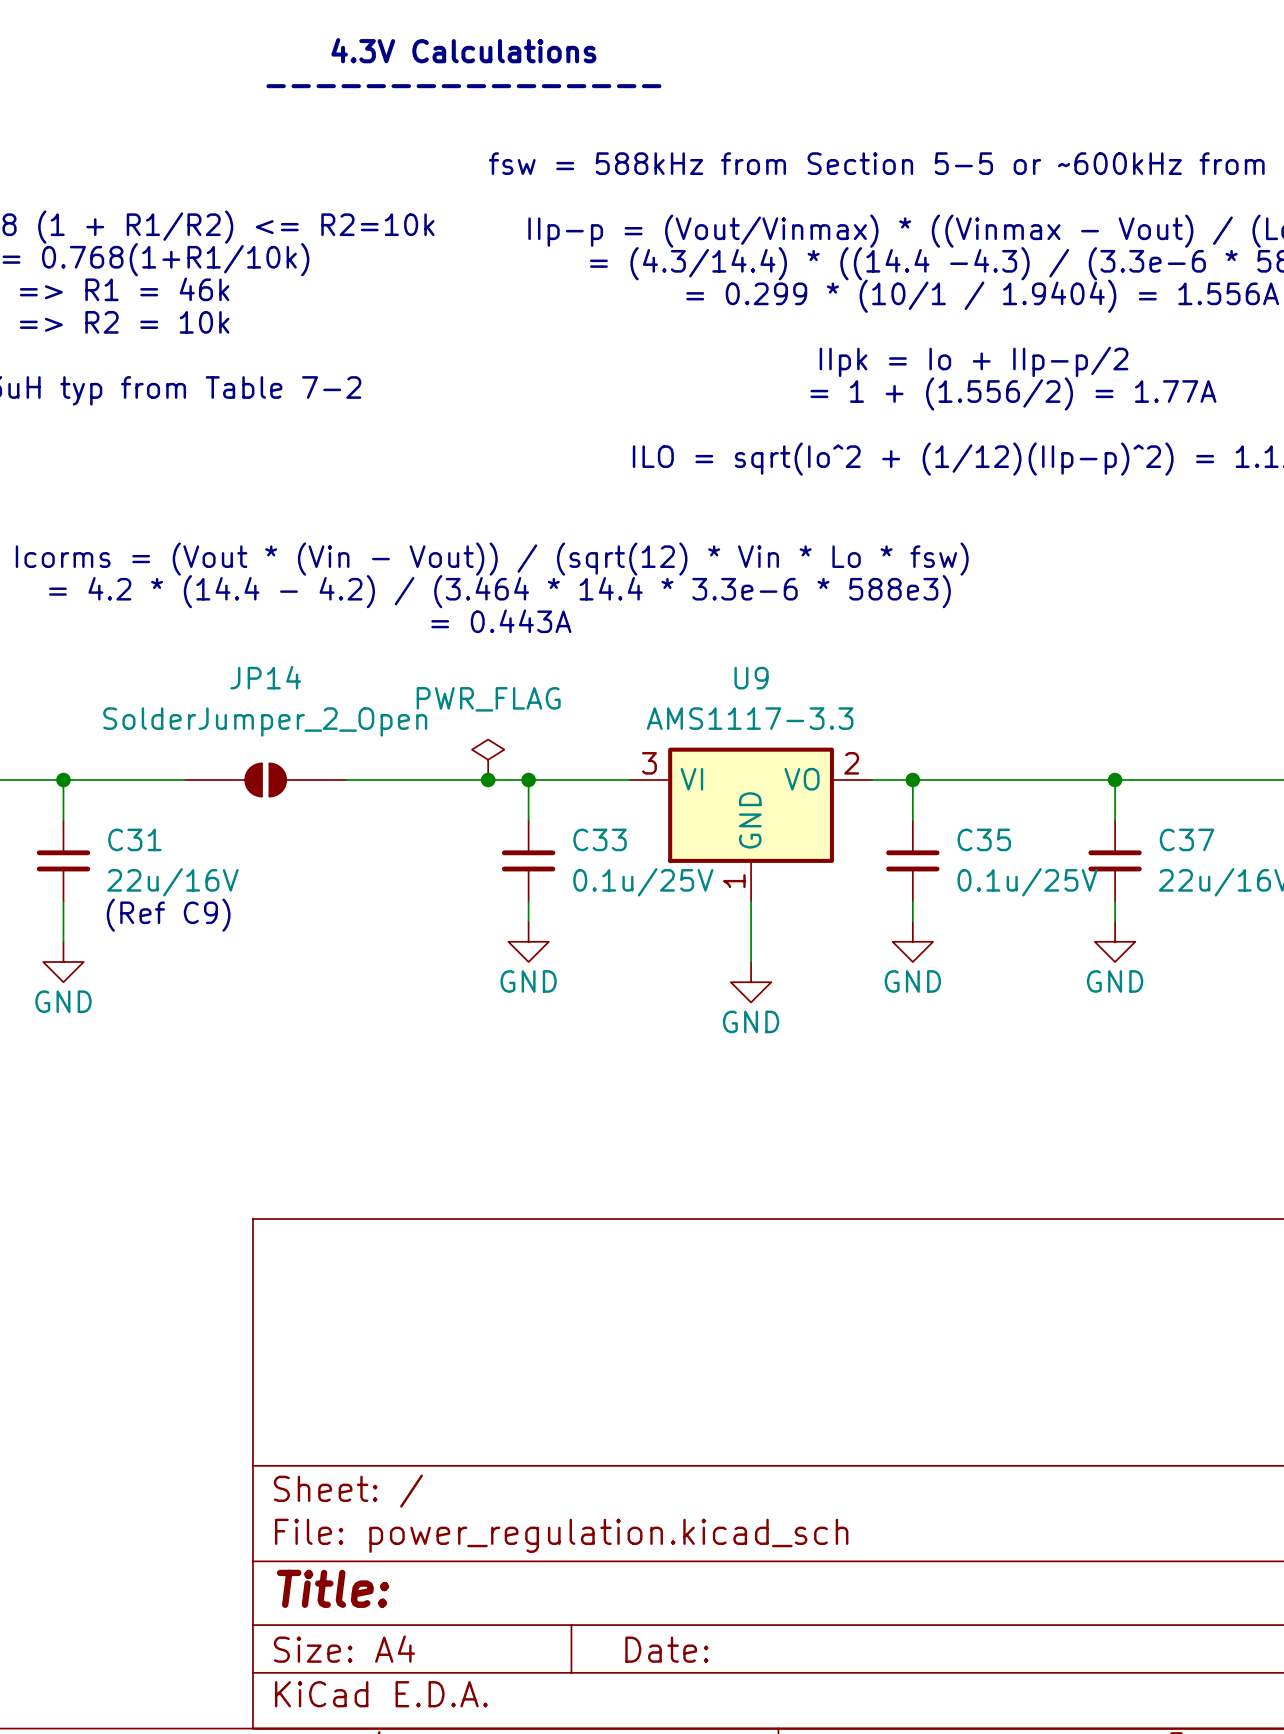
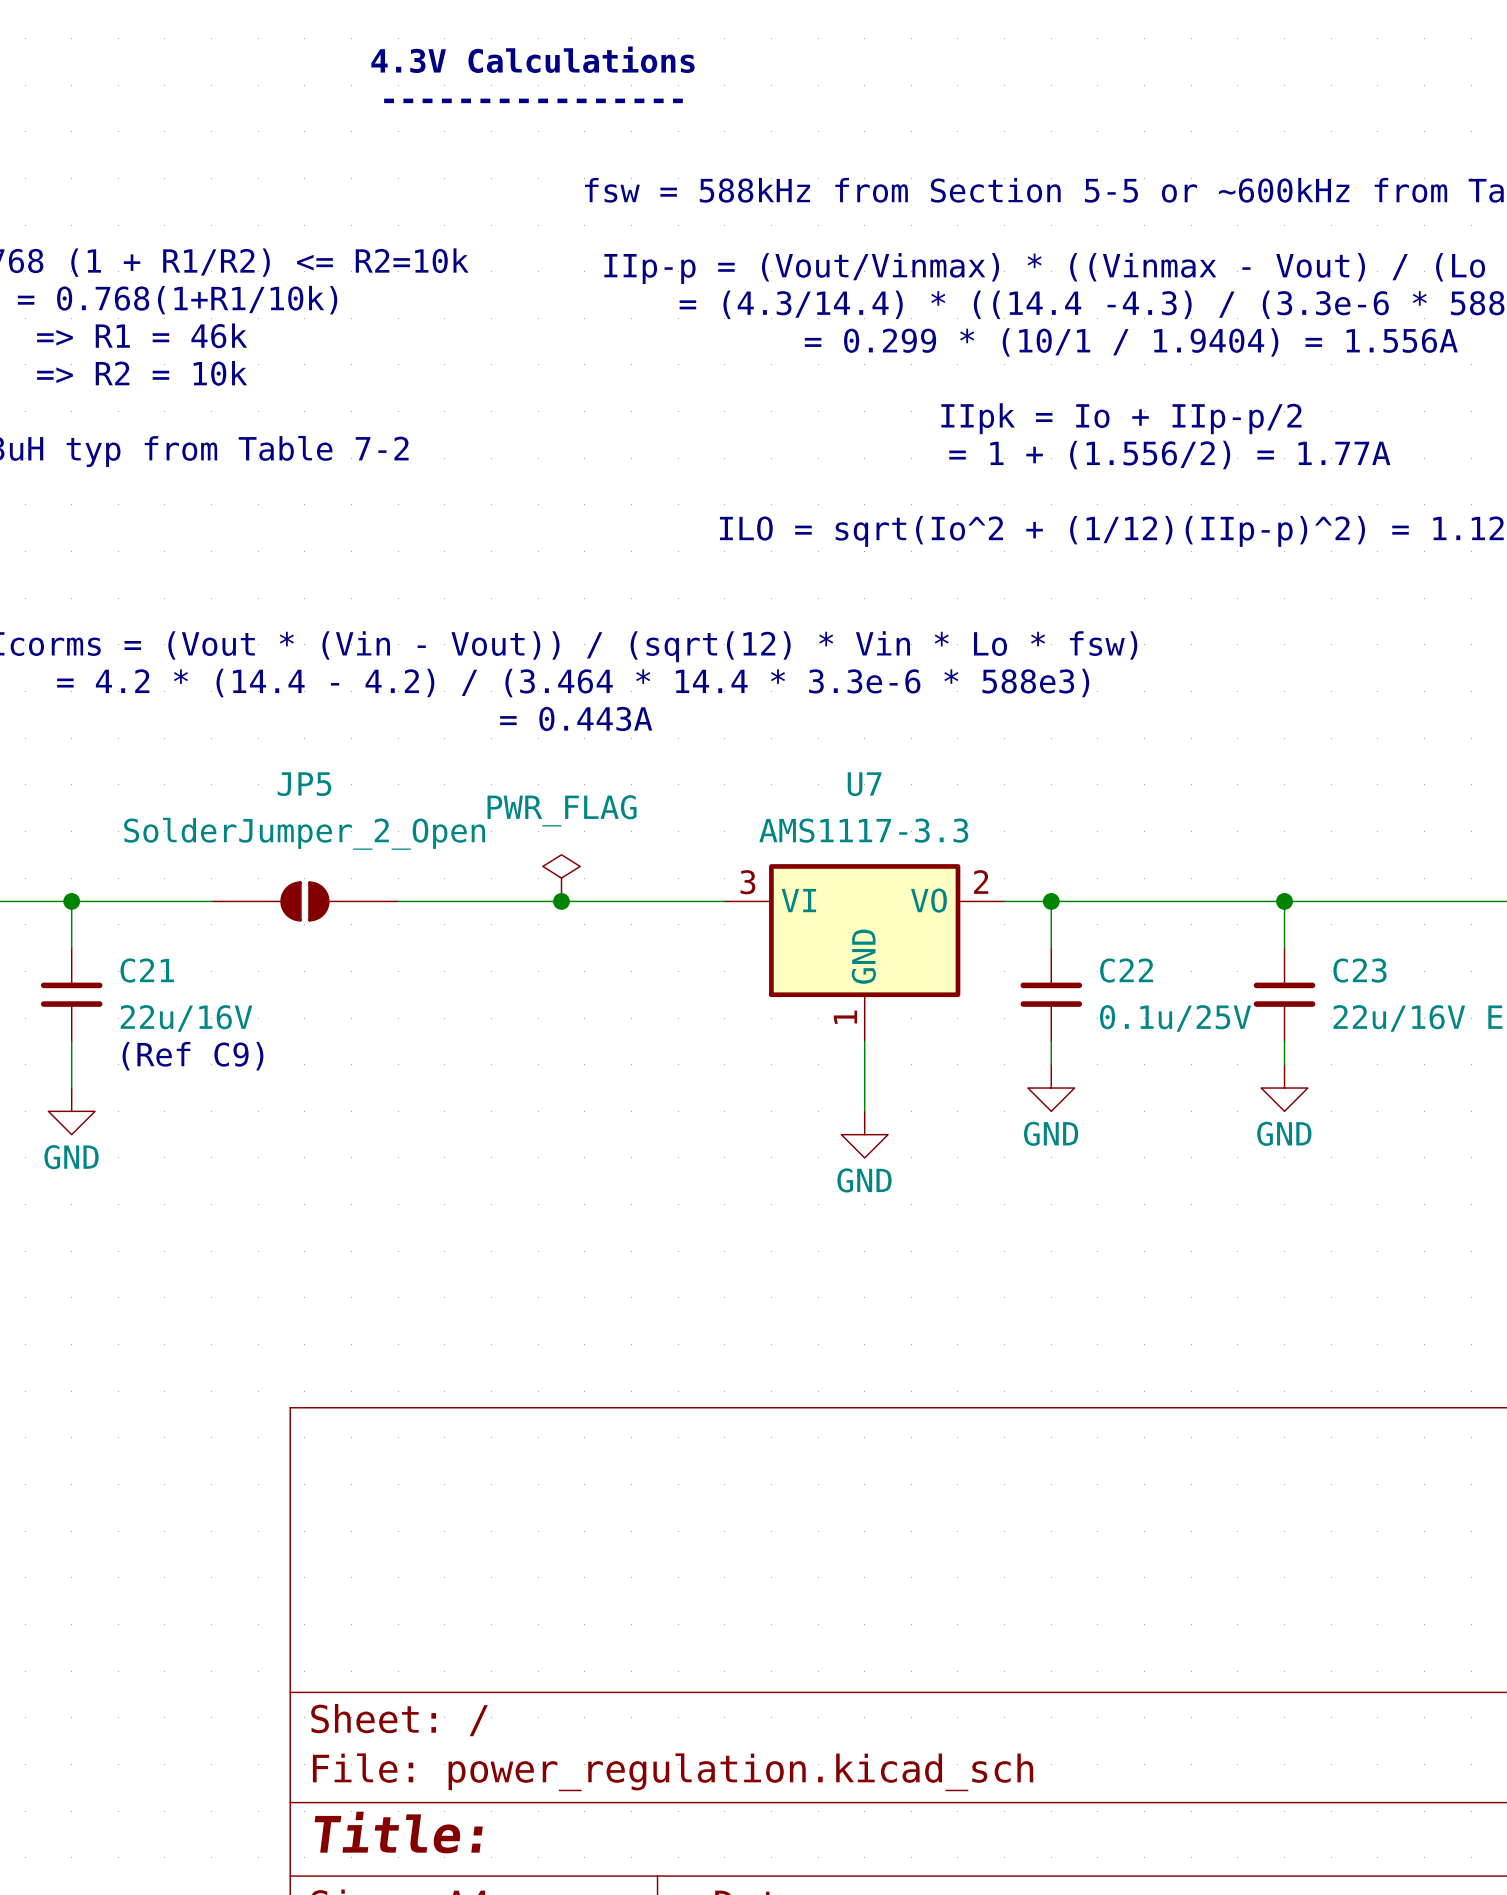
JP14 name: JP14 (265, 677) -> JP5 (304, 784)
U9 name: U9 (751, 678) -> U7 (864, 784)
wire: (528, 780) (528, 820) -> none
junction: (528, 780) -> none
C31 name: C31 (134, 839) -> C21 (147, 970)
C35 name: C35 (984, 839) -> C22 (1126, 970)
C37 name: C37 (1186, 839) -> C23 (1359, 970)
C33: 0.1u/25V (528, 860) -> none
wire: (528, 901) (528, 921) -> none
power symbol: GND (528, 941) -> none

